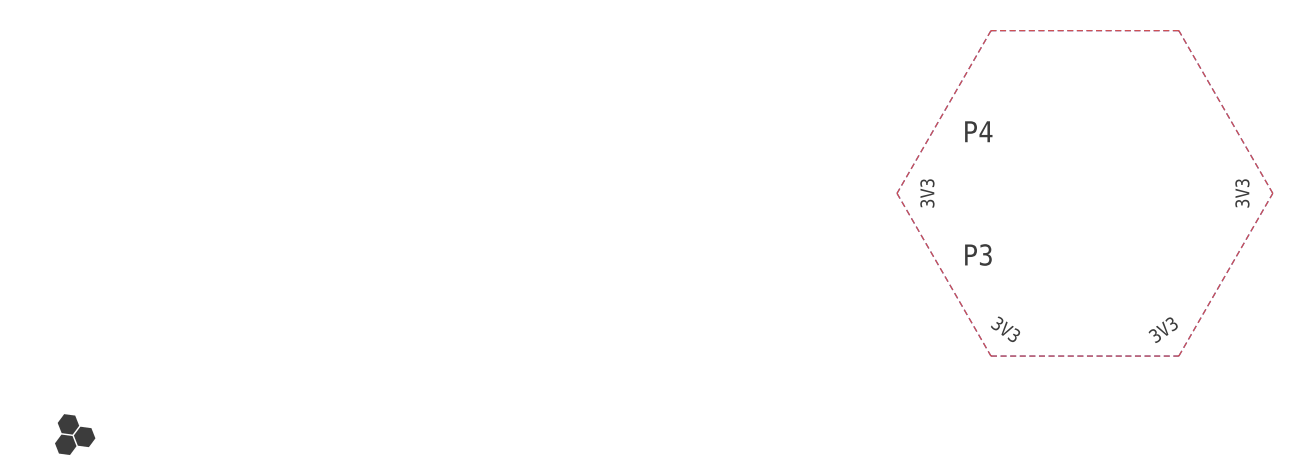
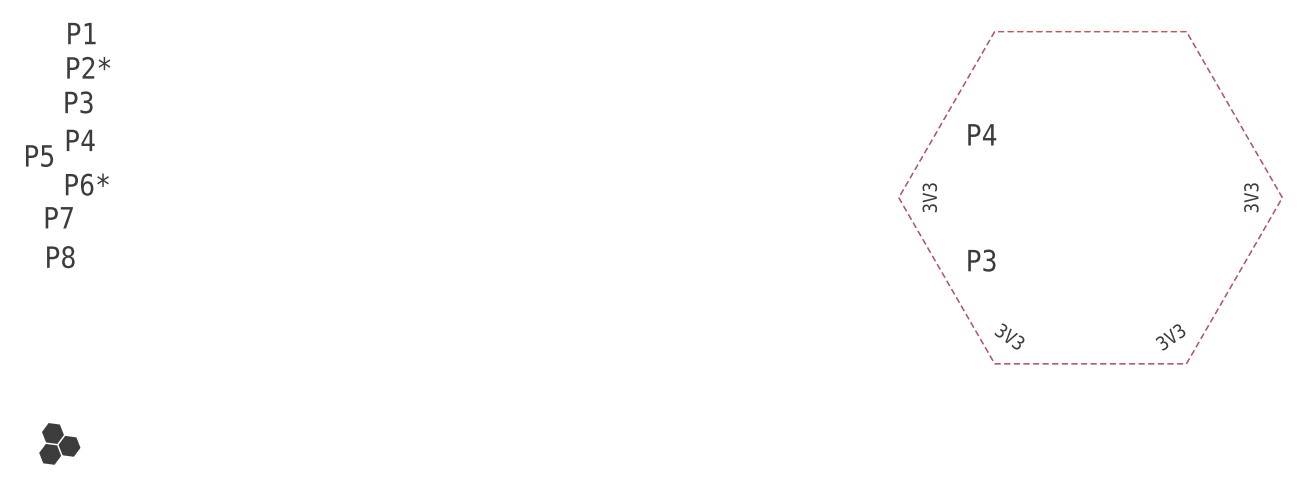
text: none -> P1 (81, 33)
text: none -> P2* (88, 67)
text: none -> P3 (78, 102)
text: none -> P4 (80, 140)
text: none -> P5 (39, 156)
text: none -> P6* (87, 184)
text: none -> P7 (59, 217)
text: none -> P8 (60, 257)

